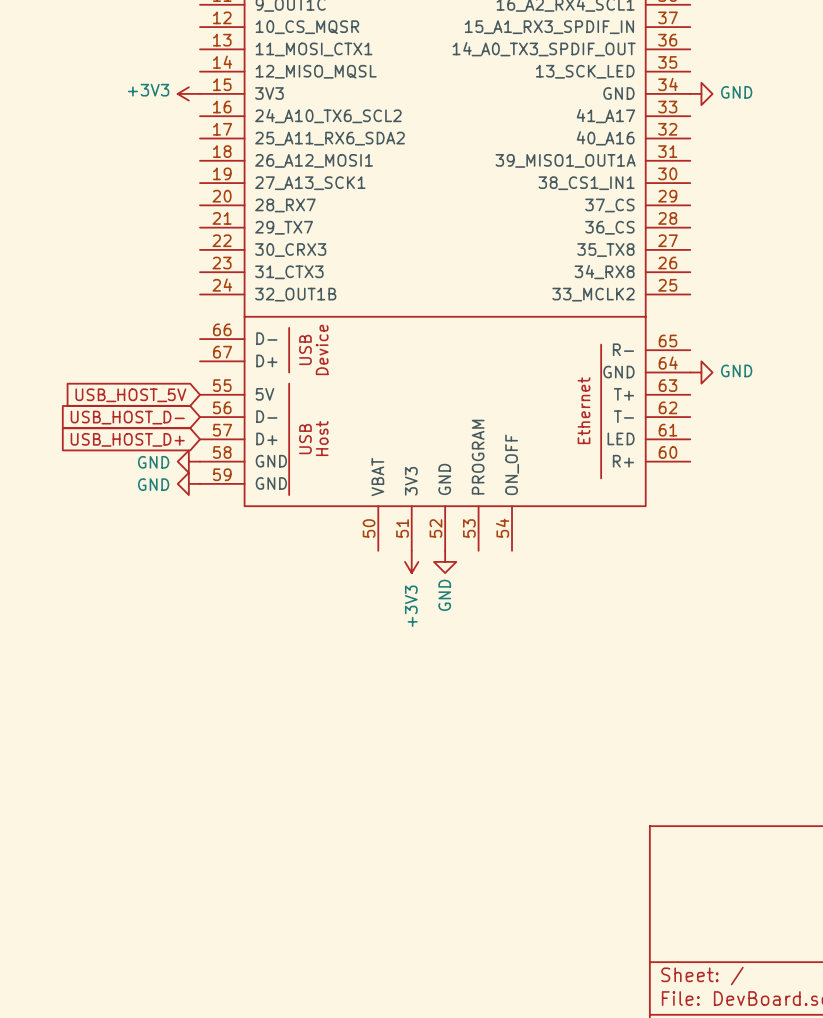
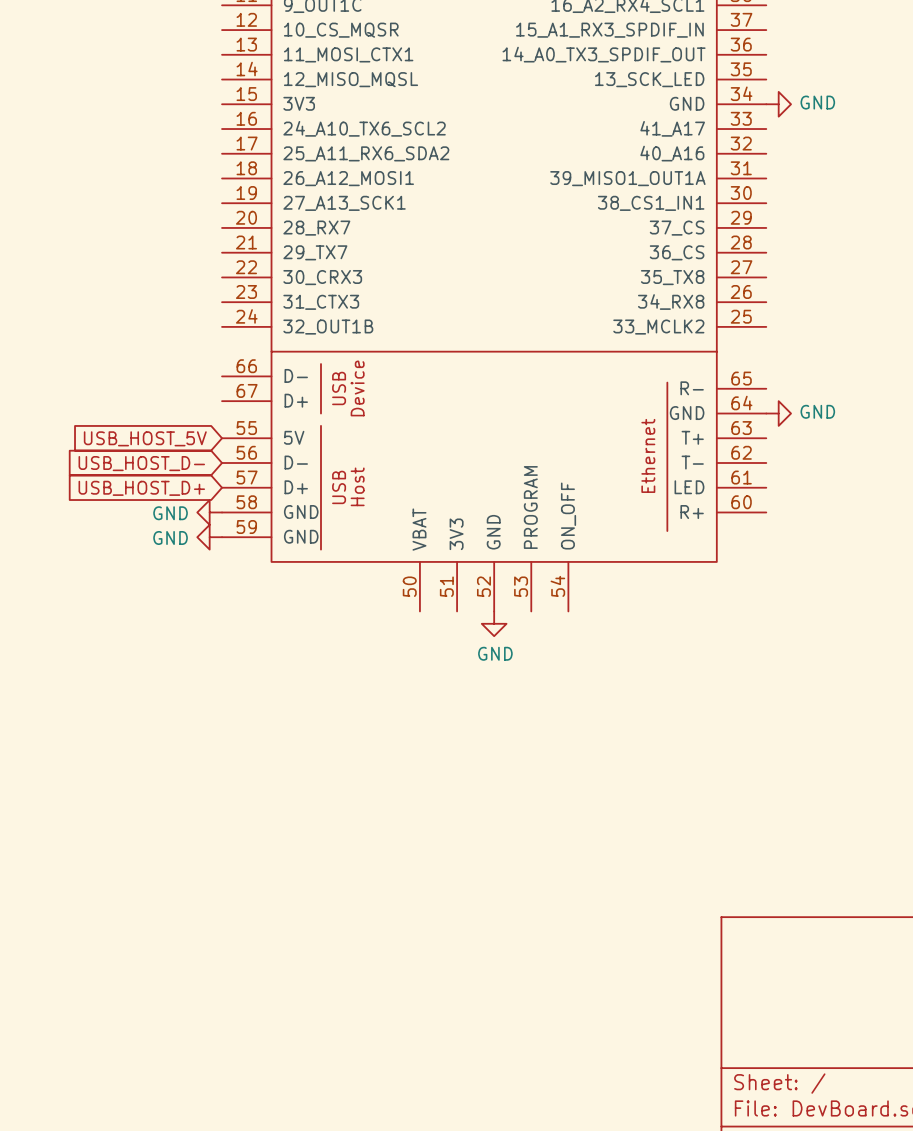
power symbol: +3V3 (188, 93) -> none
power symbol: +3V3 (411, 561) -> none
power symbol text rotation: 0° (444, 595) -> 90° clockwise (495, 653)

